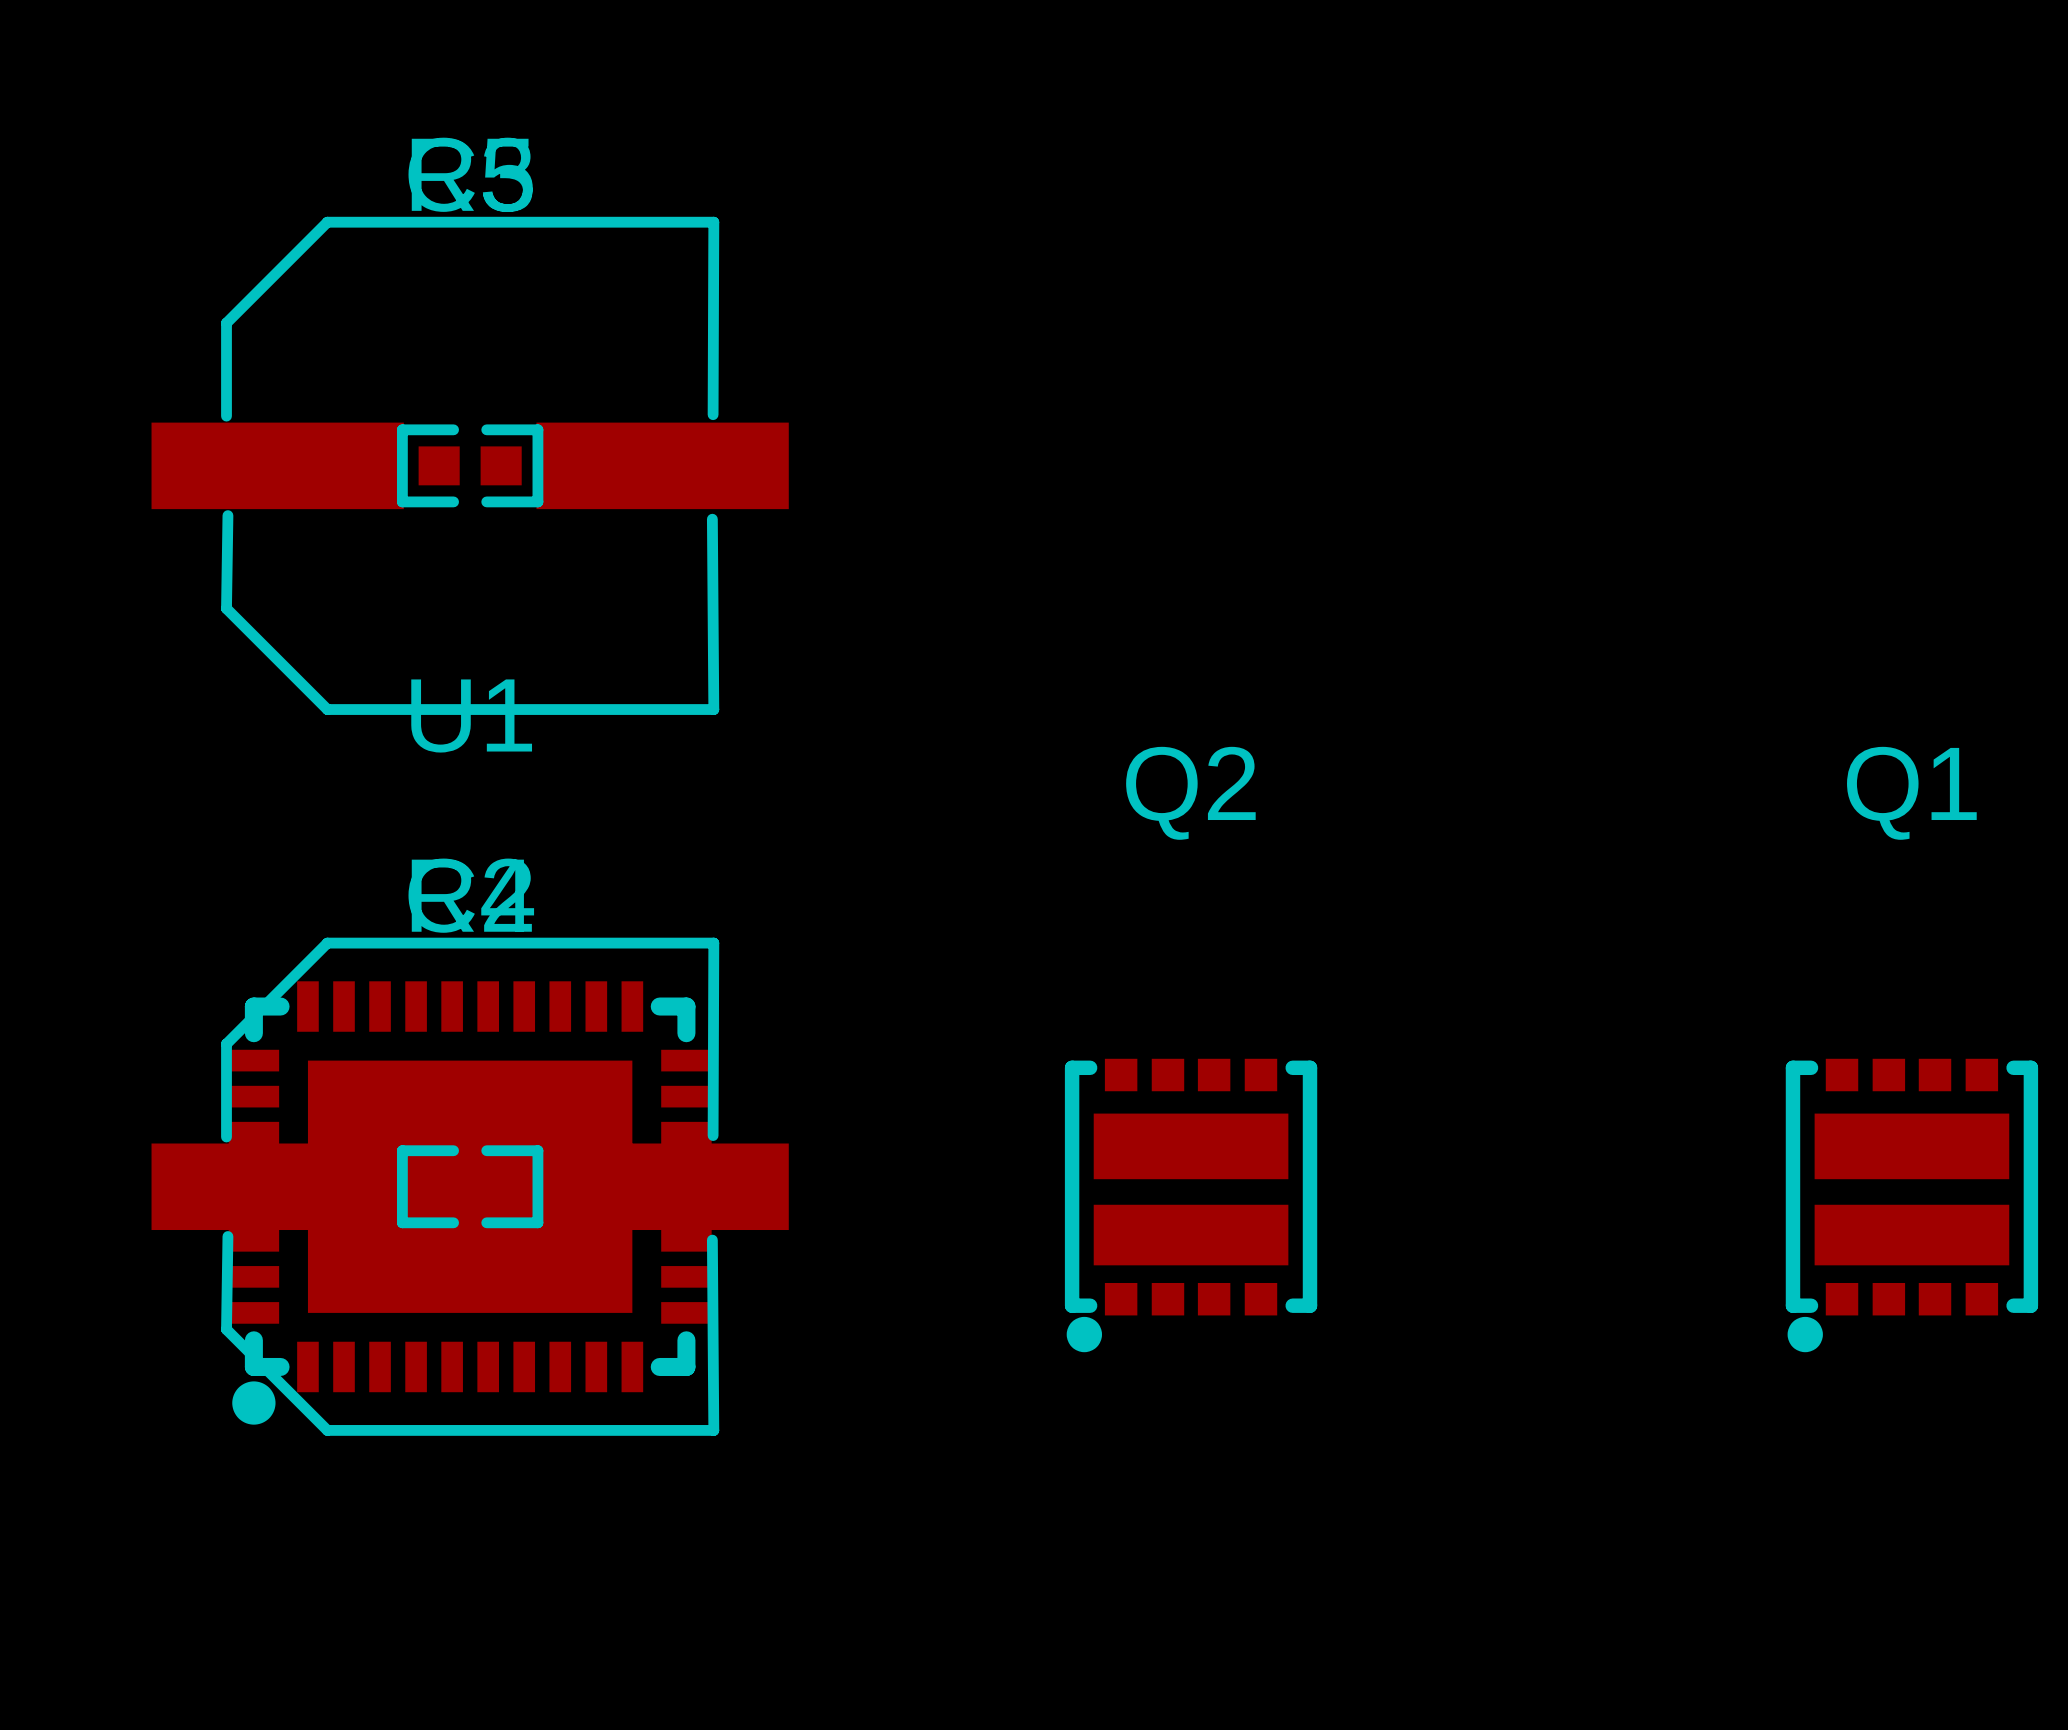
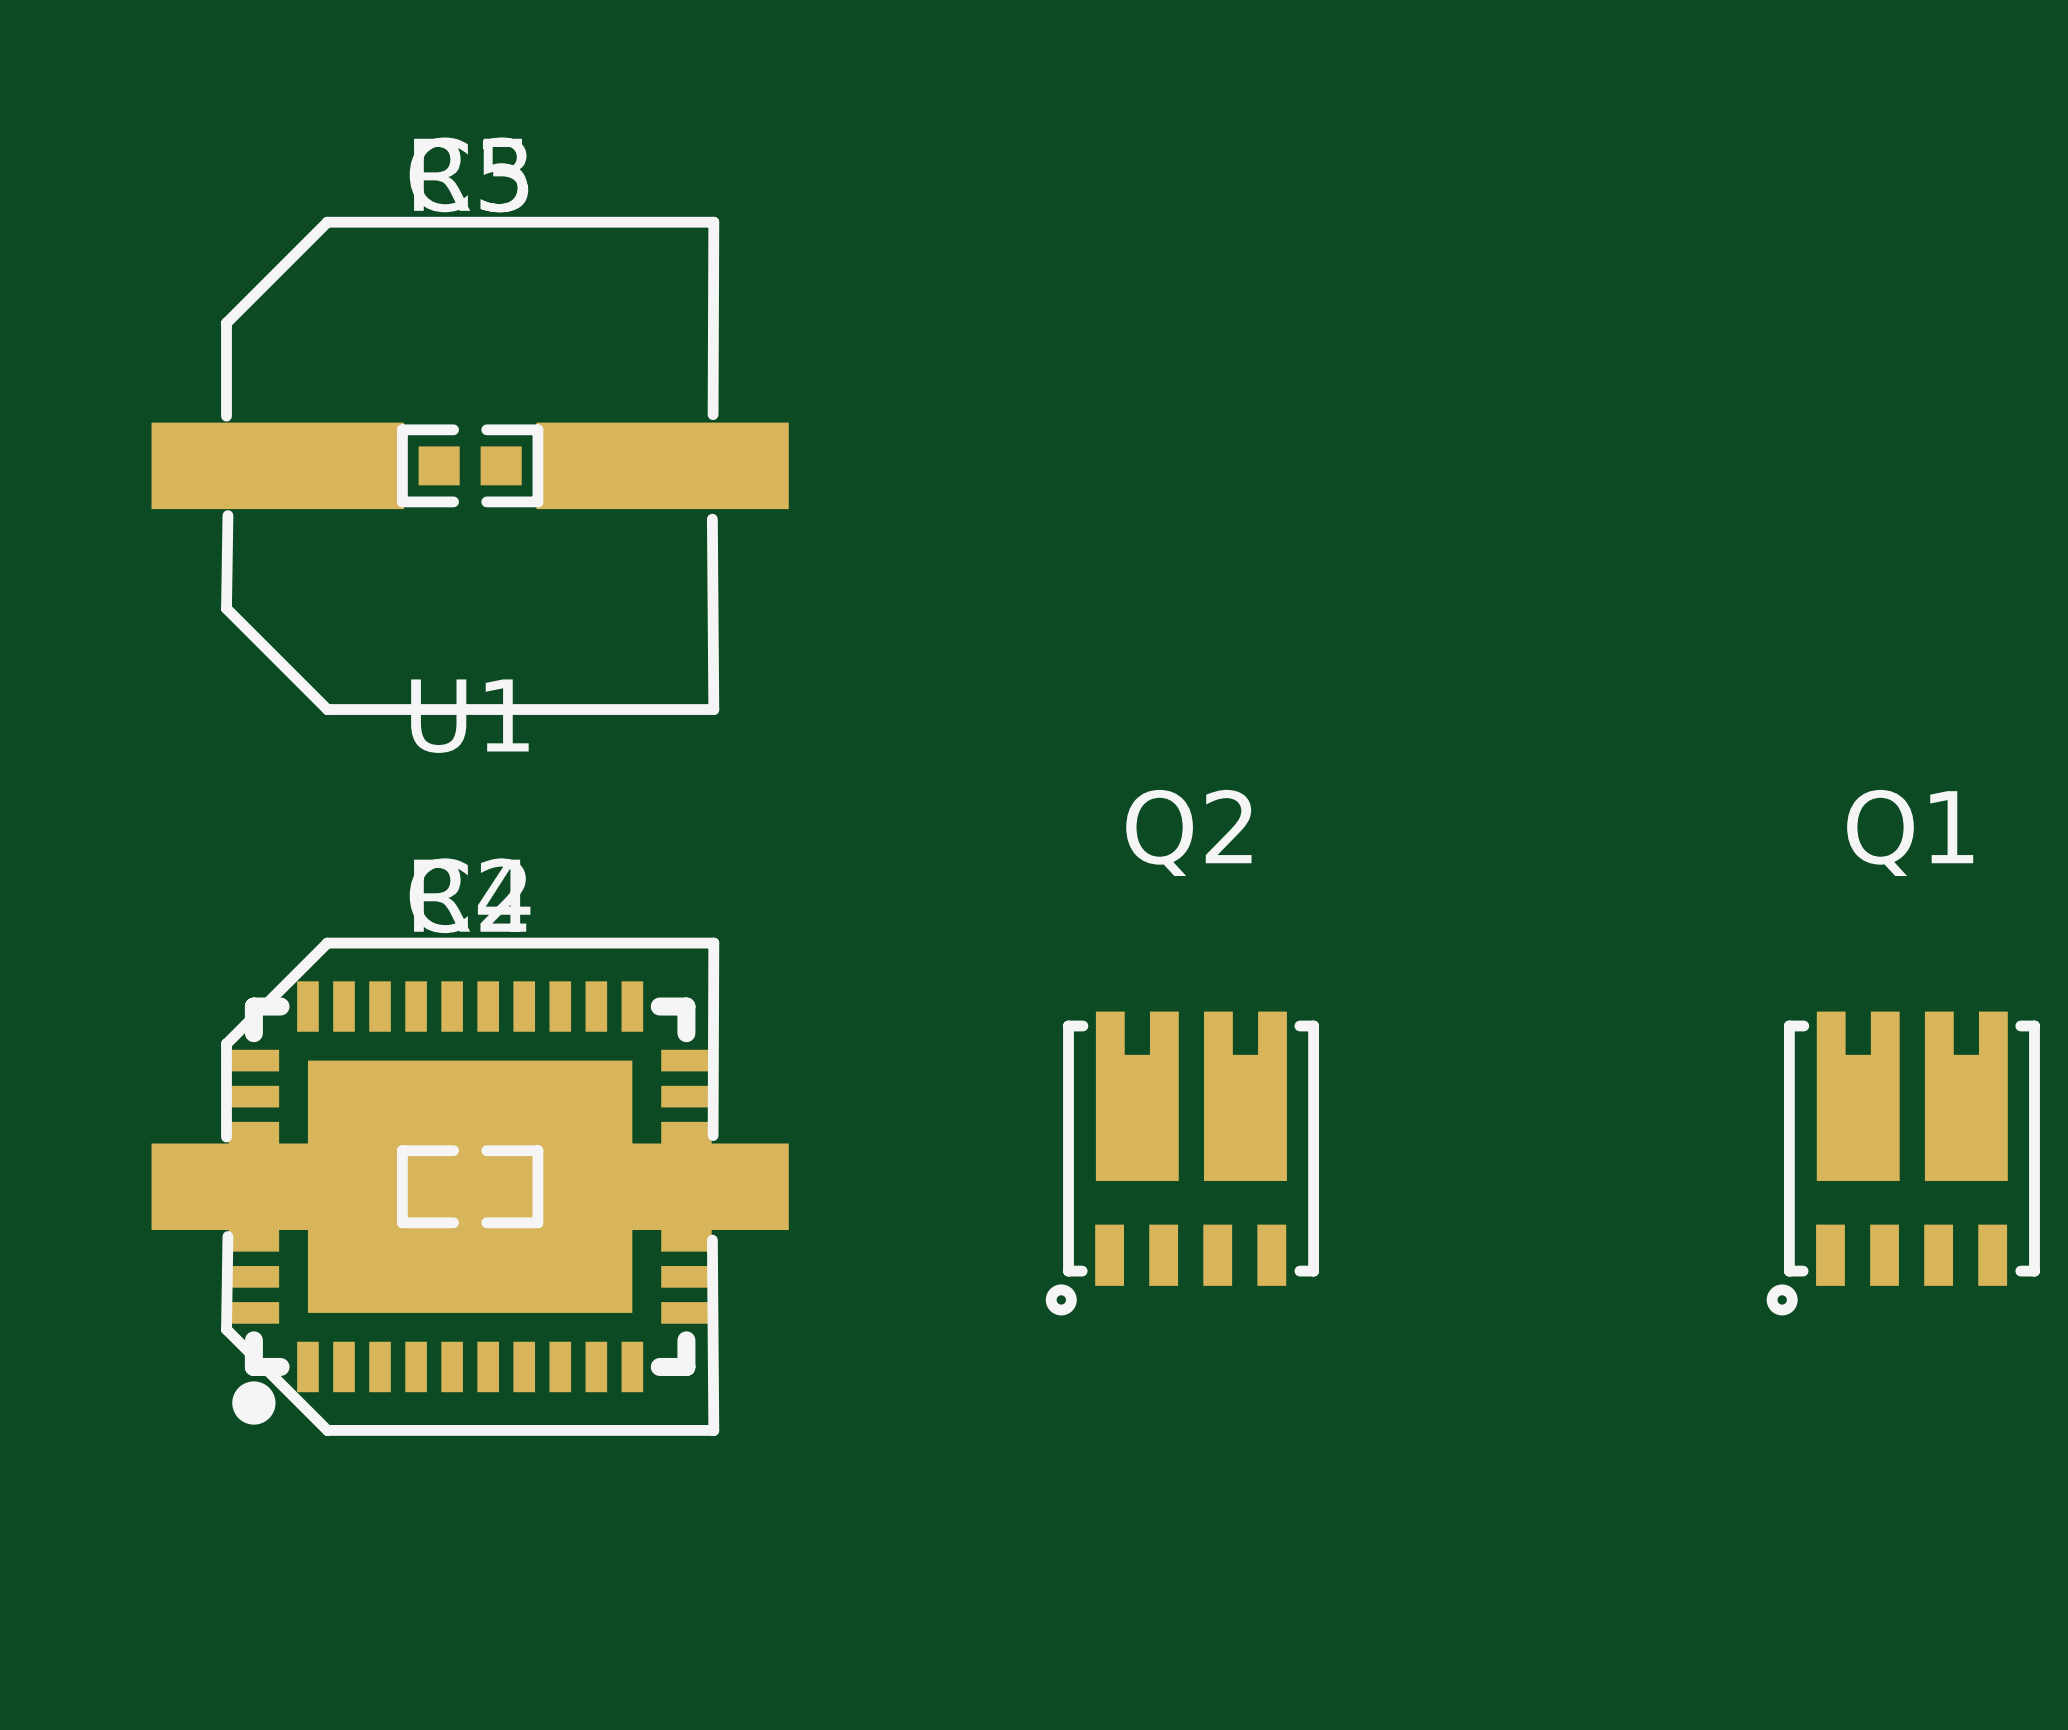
Q2 name position: Q2 (1190, 793) -> Q2 (1188, 832)
Q1 name position: Q1 (1911, 793) -> Q1 (1910, 832)
Q2 footprint: [1064, 1058, 1318, 1353] -> [1045, 1011, 1320, 1316]
Q1 footprint: [1785, 1058, 2039, 1353] -> [1766, 1011, 2040, 1316]

